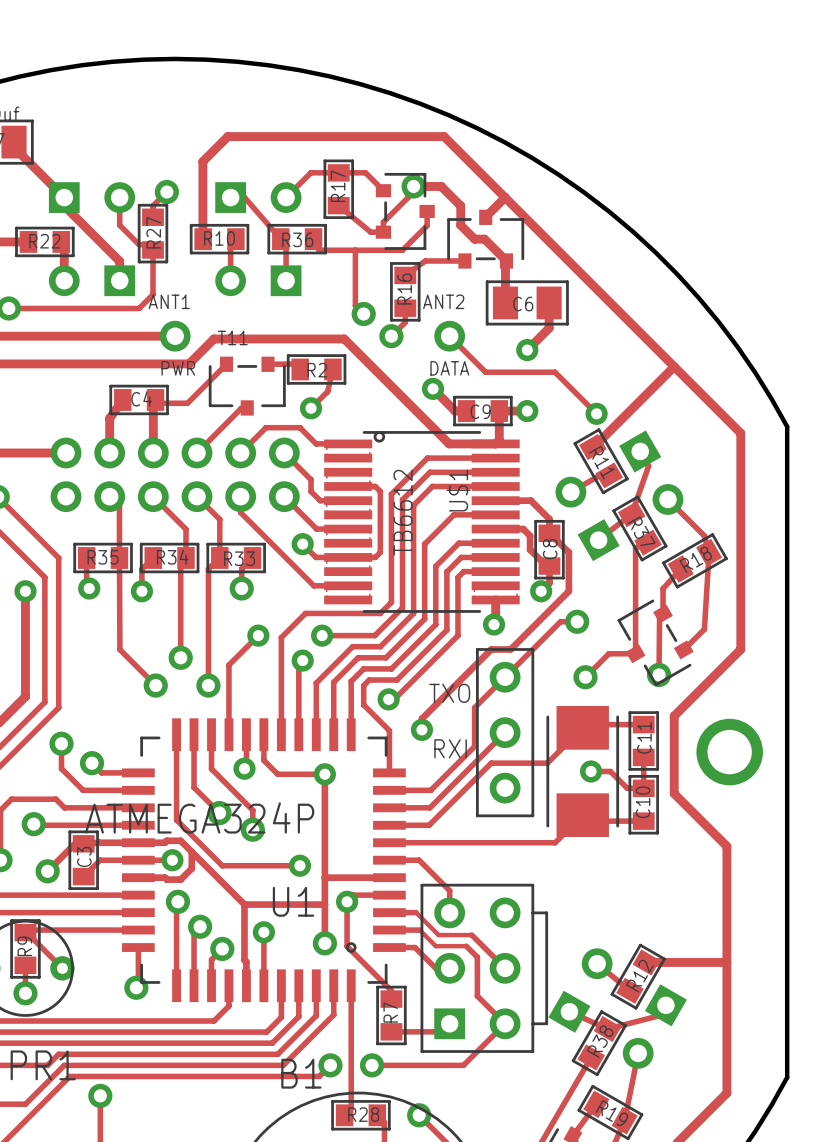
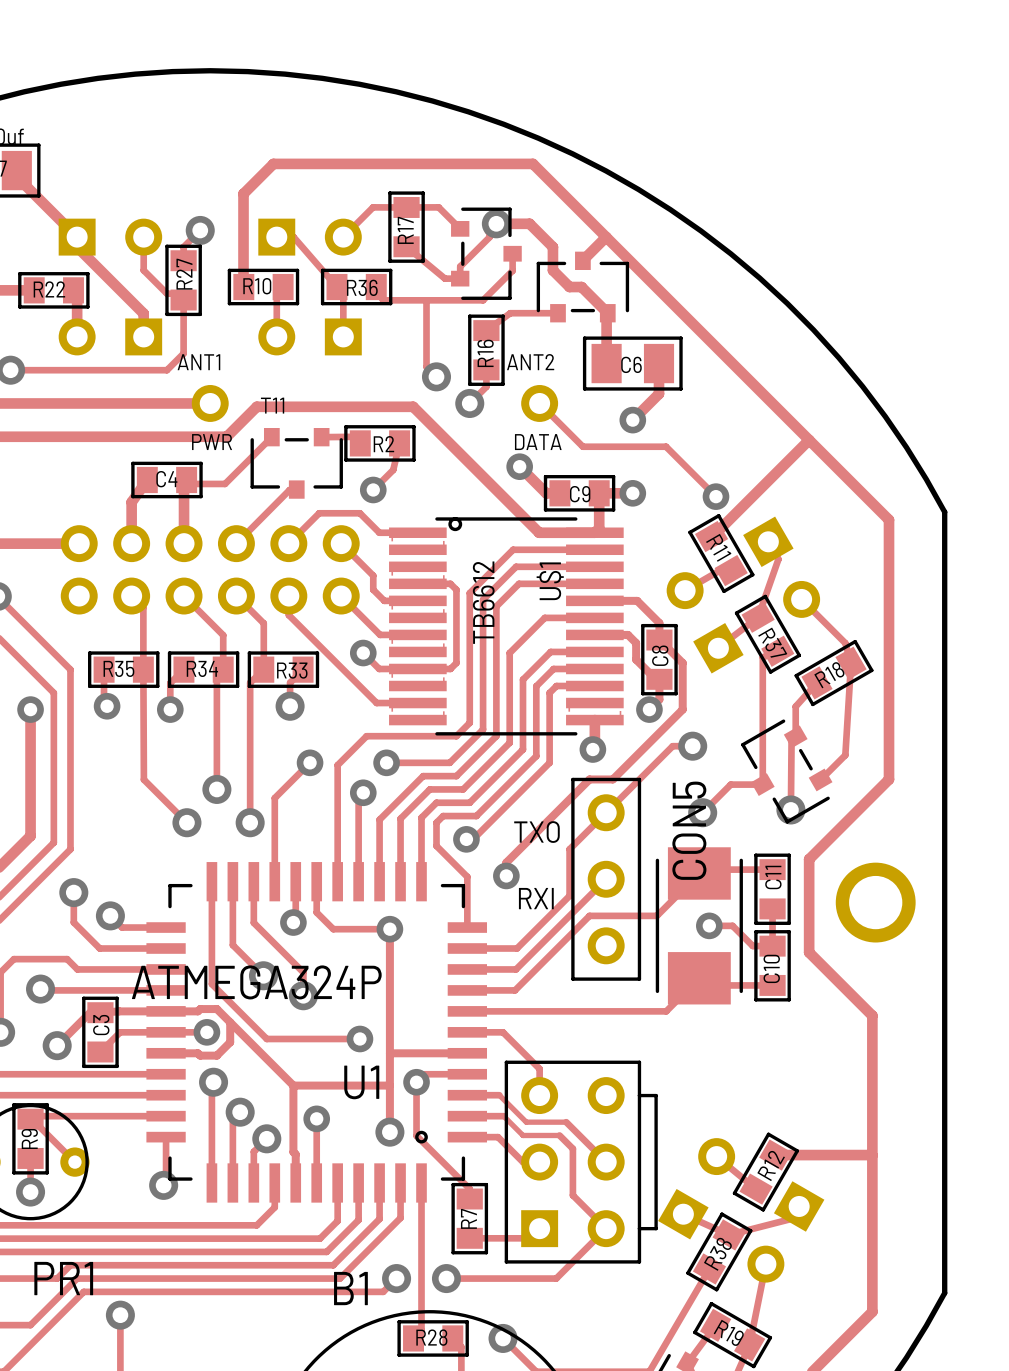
CON5 name: none -> CON5 (689, 830)

